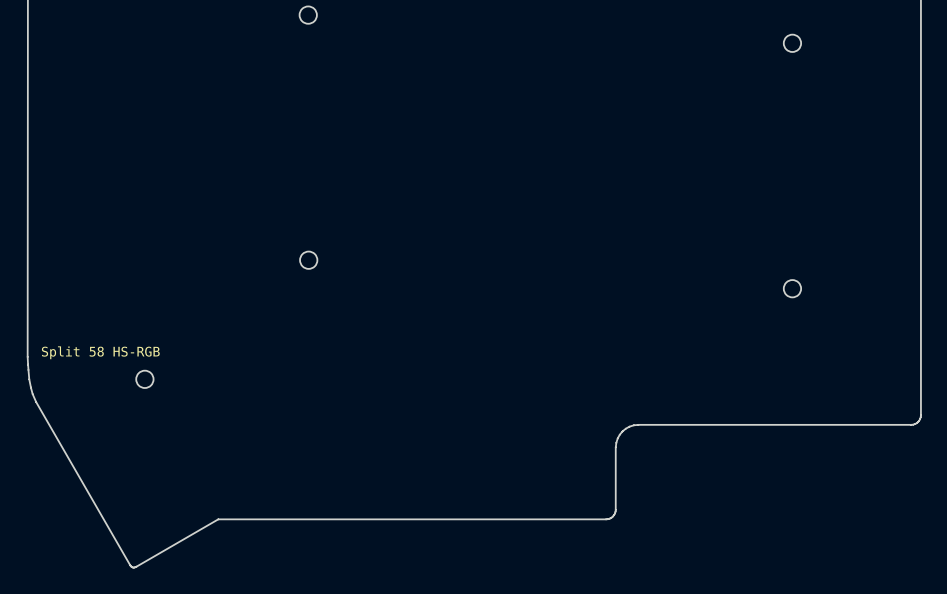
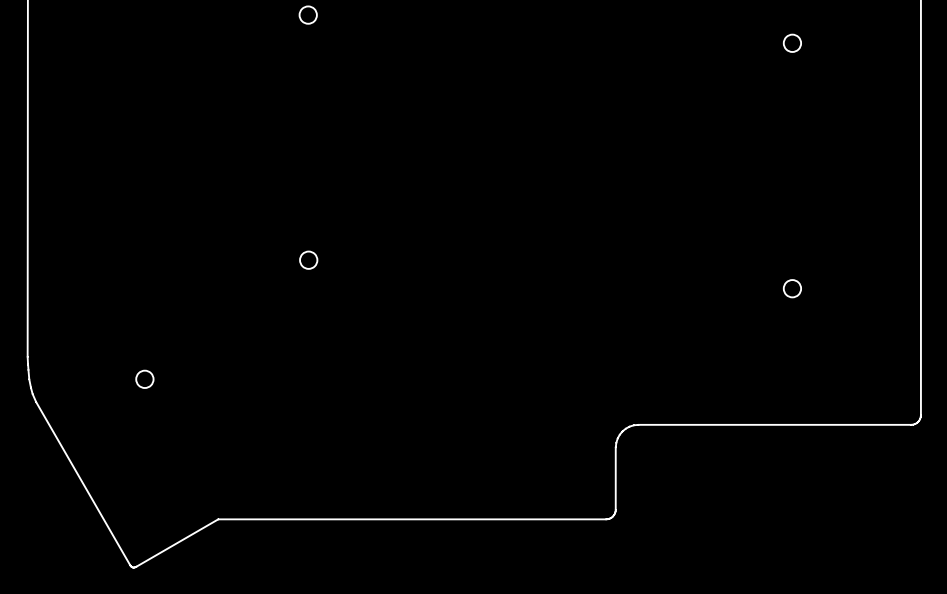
text: Split 58 HS-RGB (100, 352) -> none

